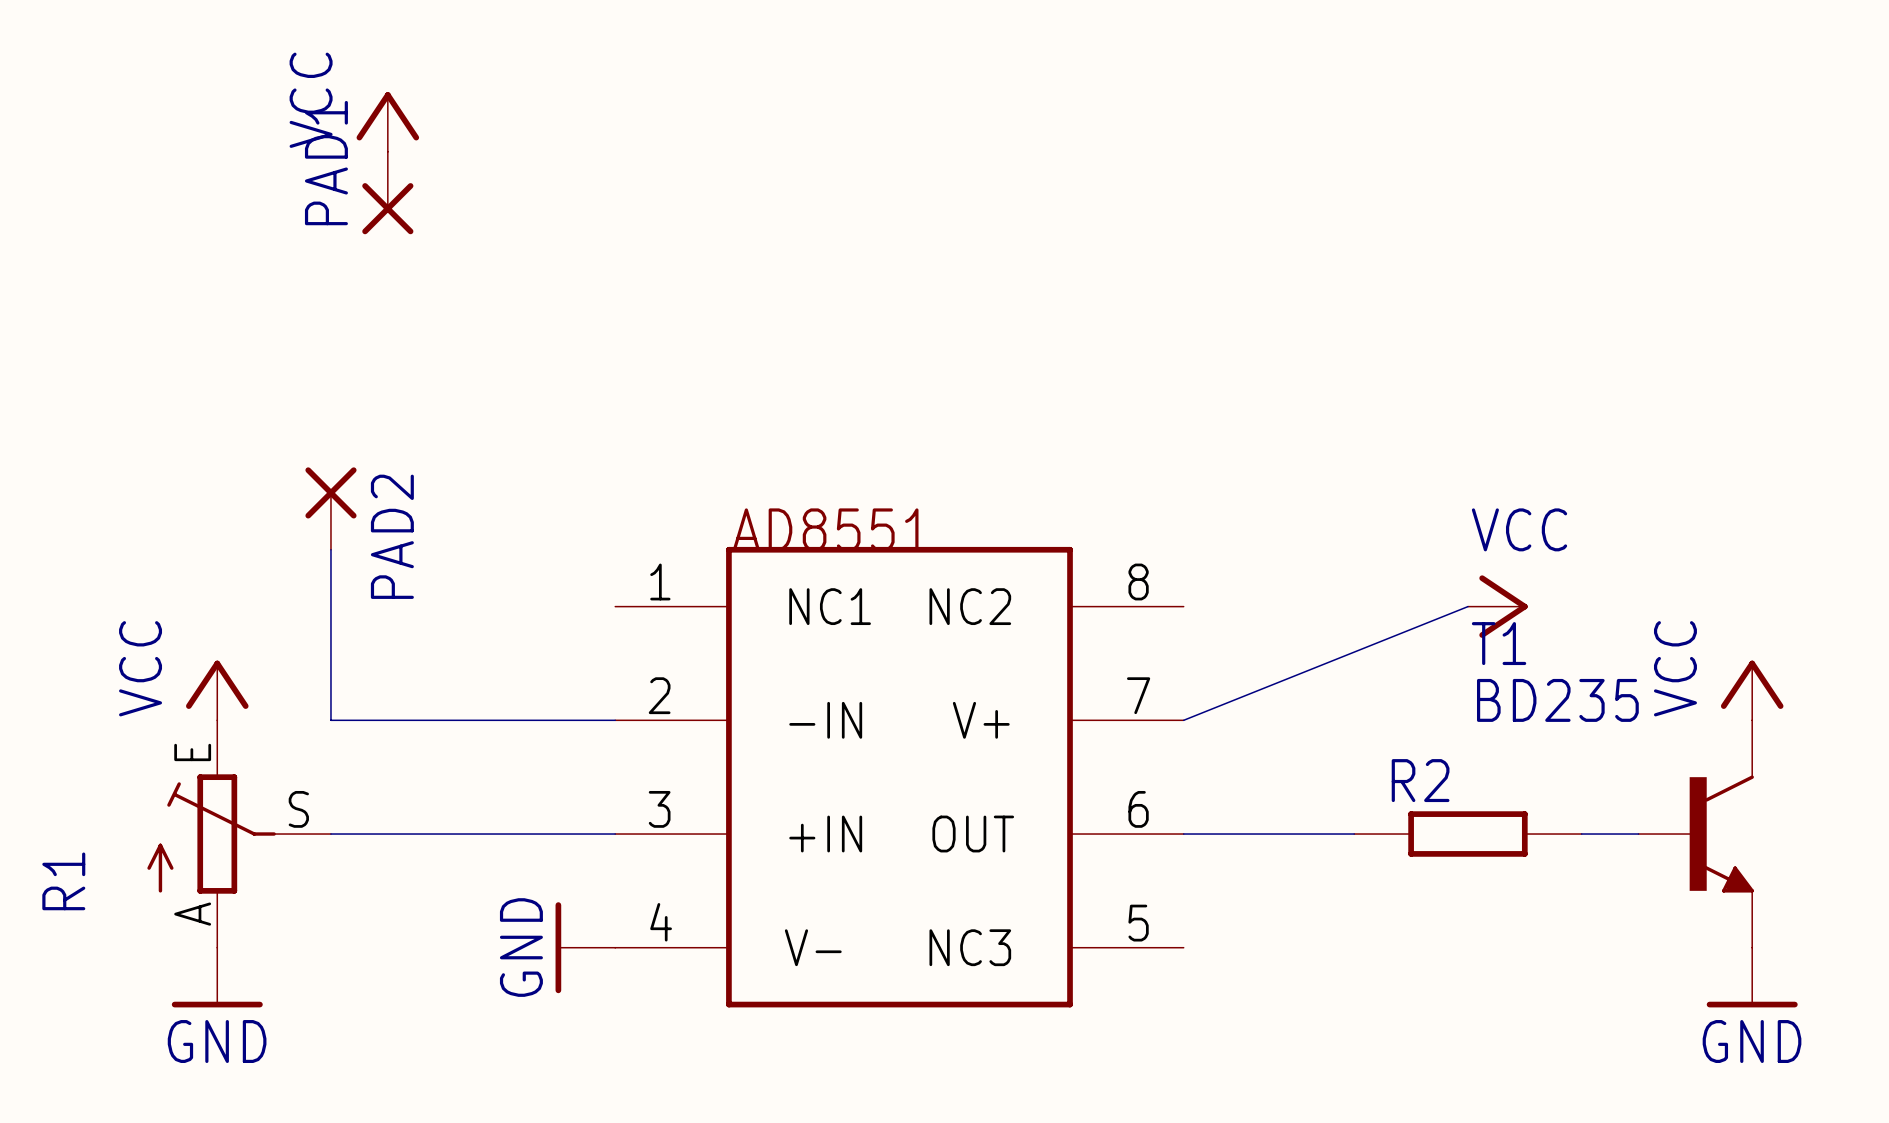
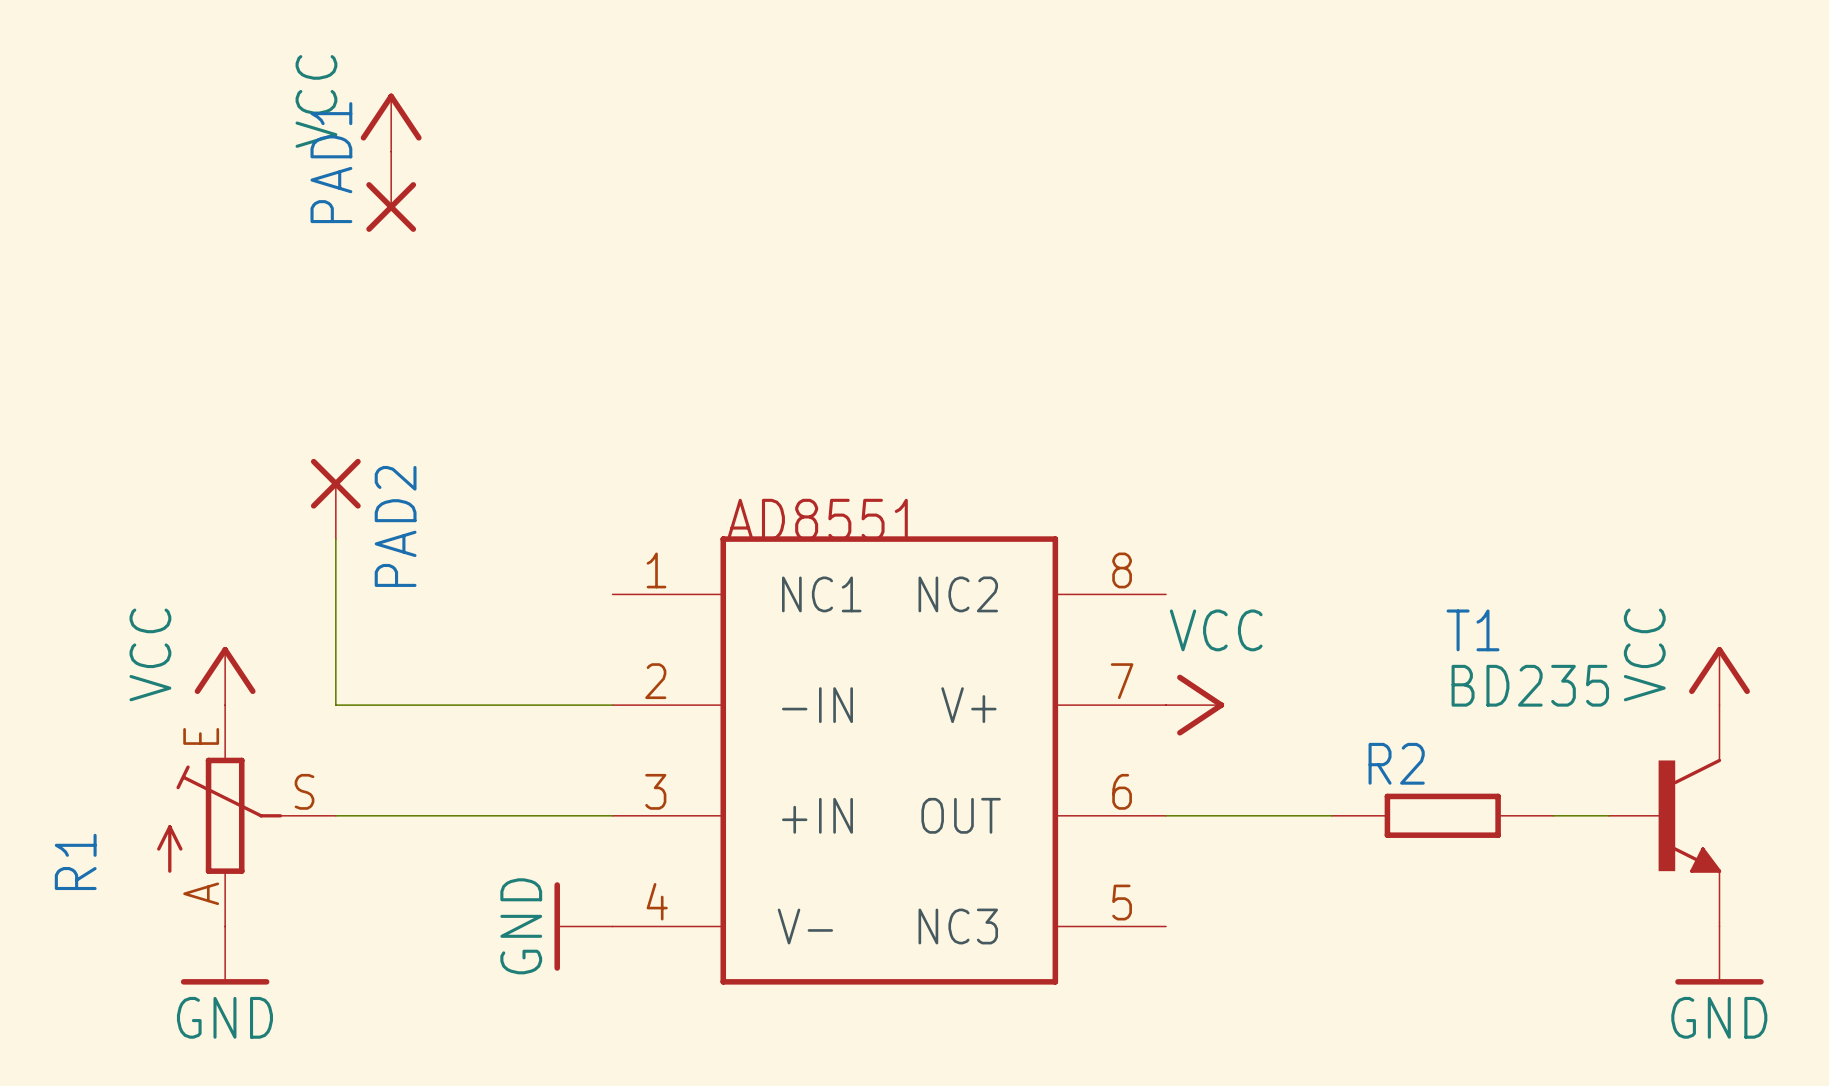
wire: (1467, 606) (1183, 720) -> none
power symbol position: VCC (1497, 606) -> VCC (1195, 705)

